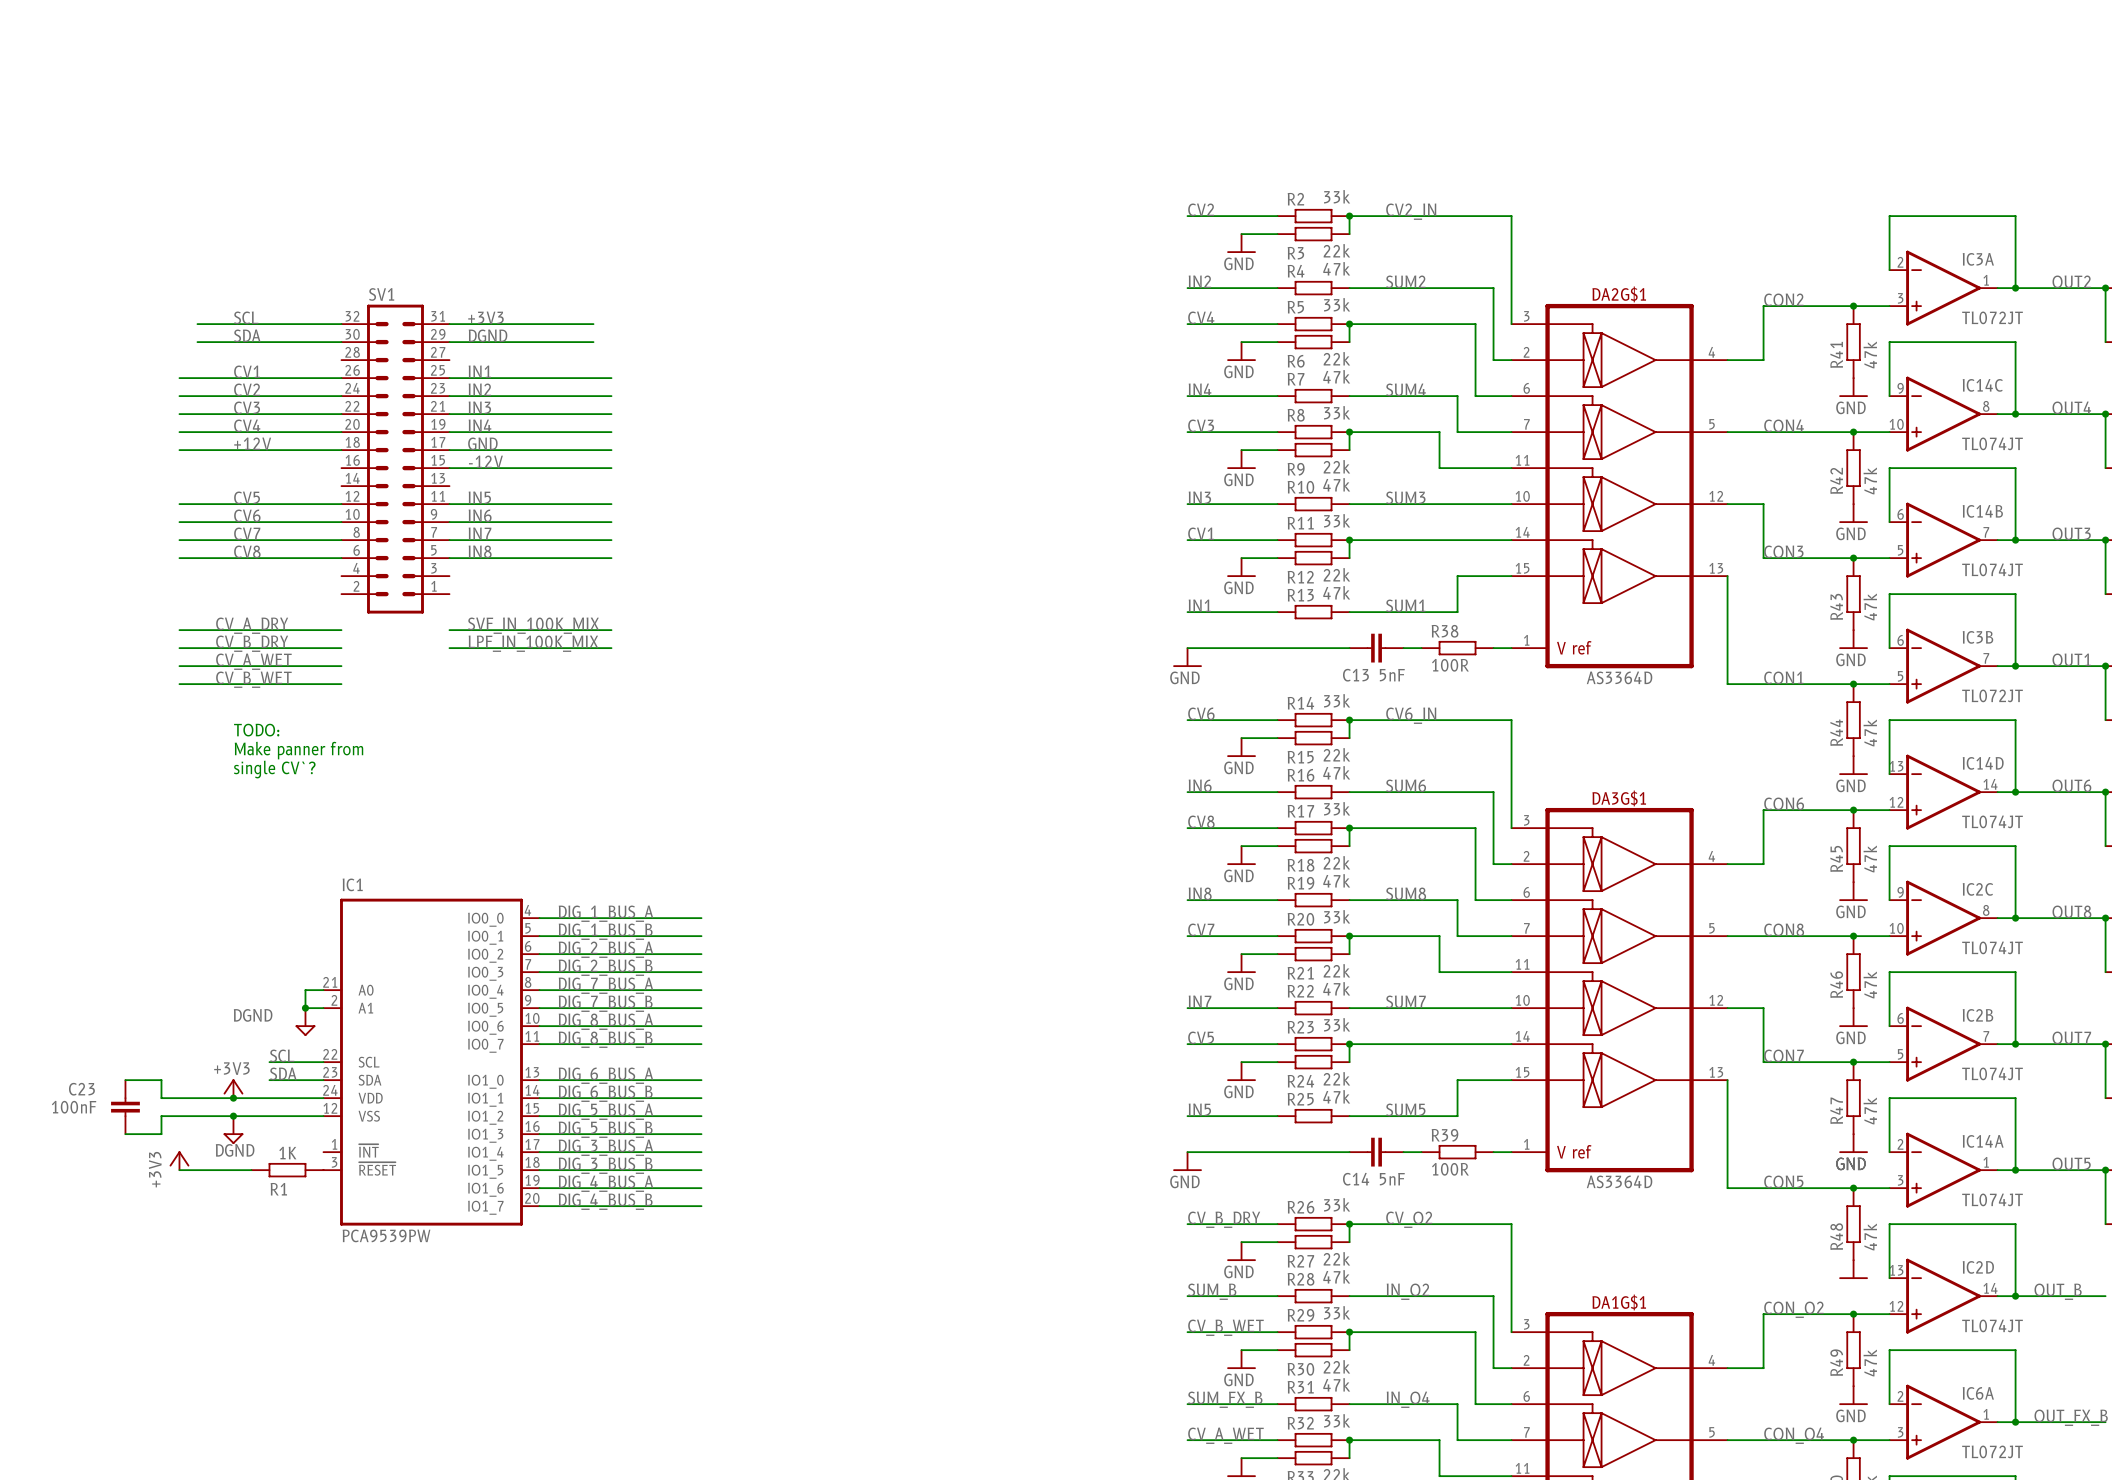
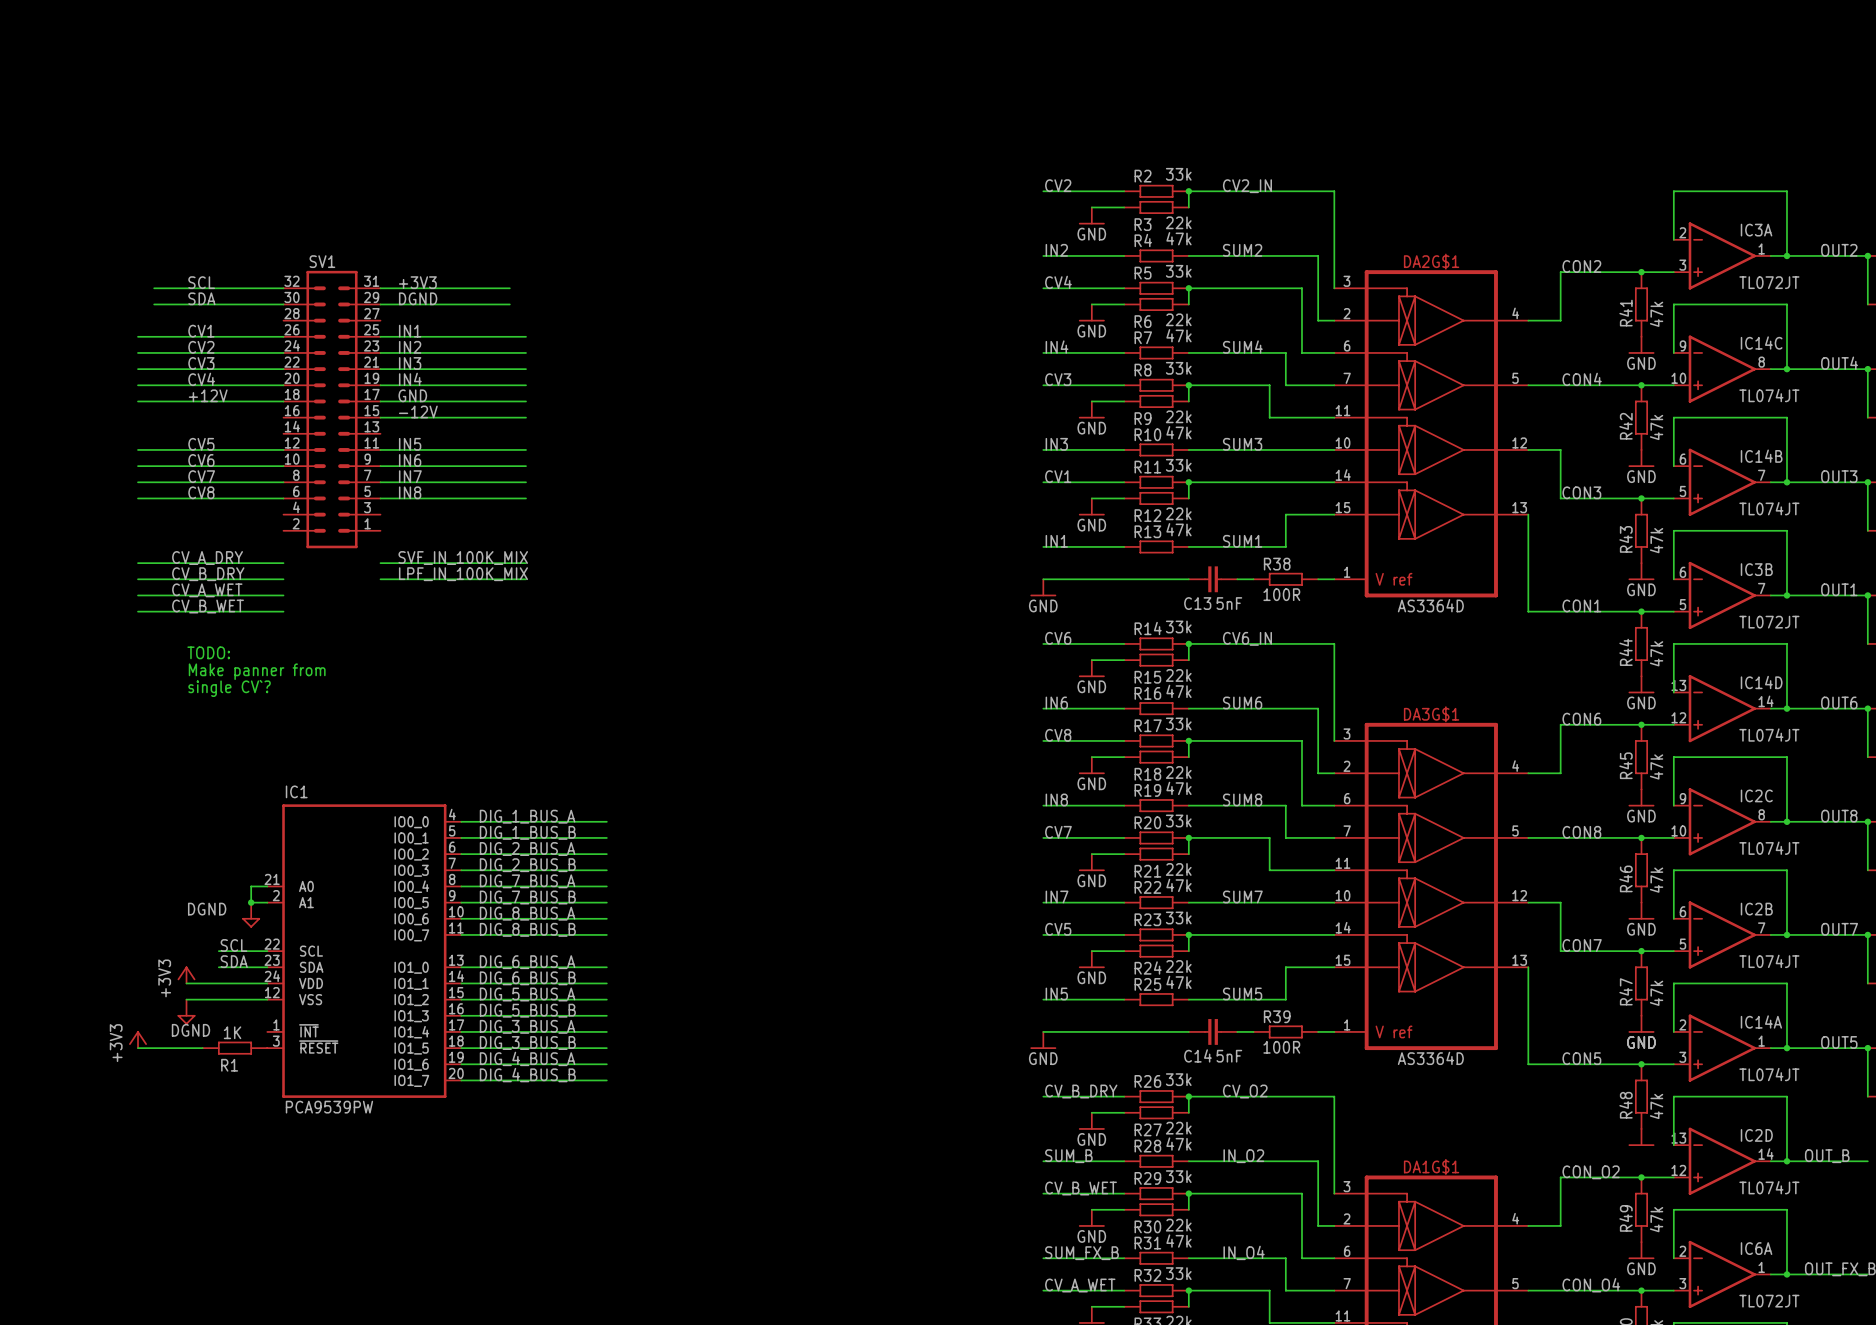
power symbol text rotation: 0° (231, 1068) -> 90° counterclockwise (164, 978)
wire: (125, 1080) (161, 1080) (161, 1098) (233, 1098) -> none
junction: (233, 1098) -> none
C23: 100nF (125, 1107) -> none
wire: (233, 1116) (161, 1116) (161, 1134) (125, 1134) -> none
junction: (233, 1116) -> none

